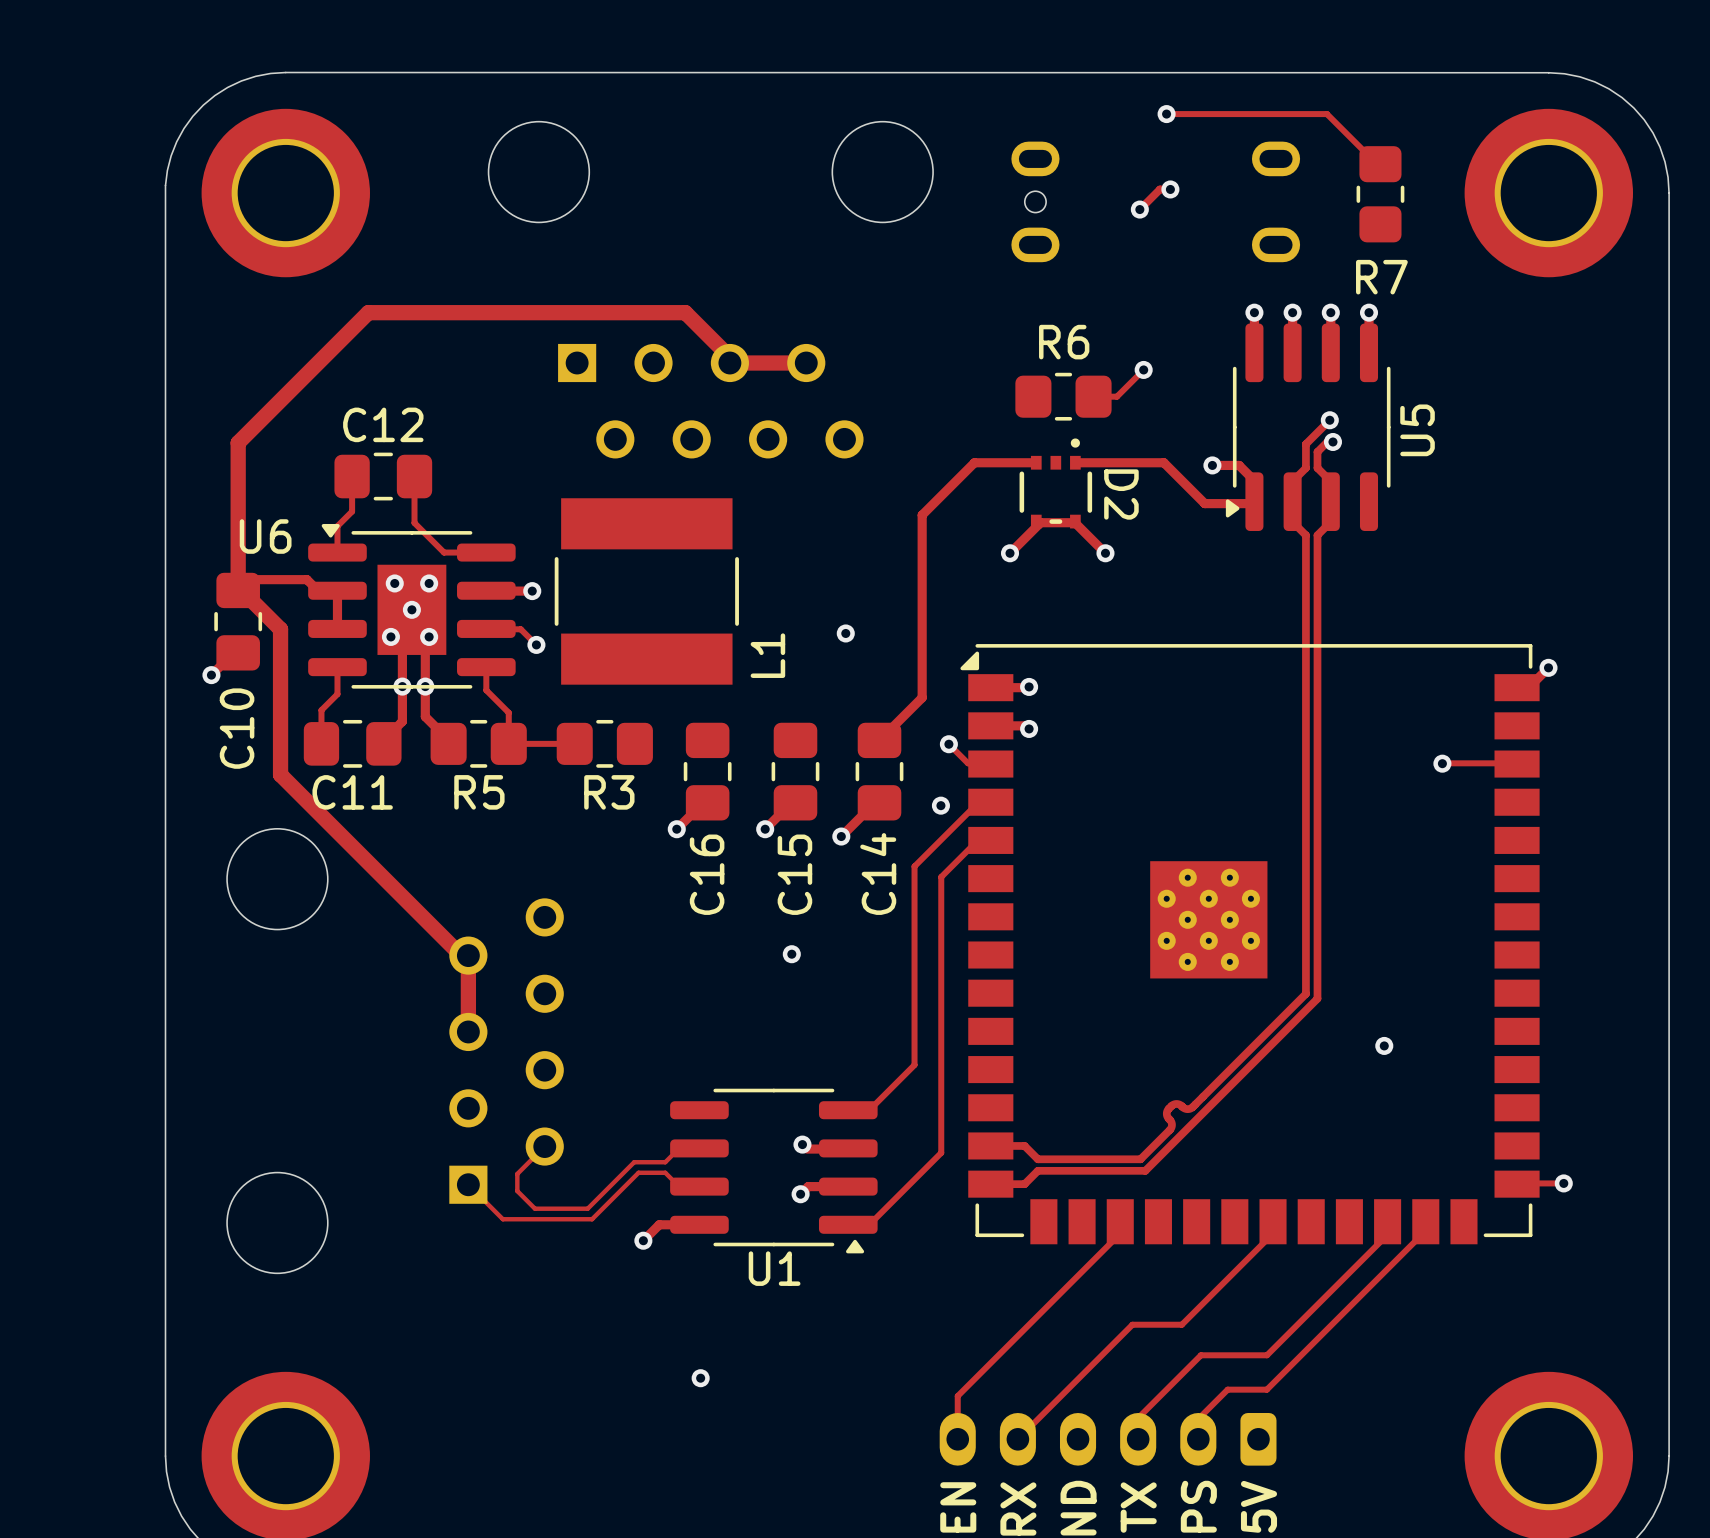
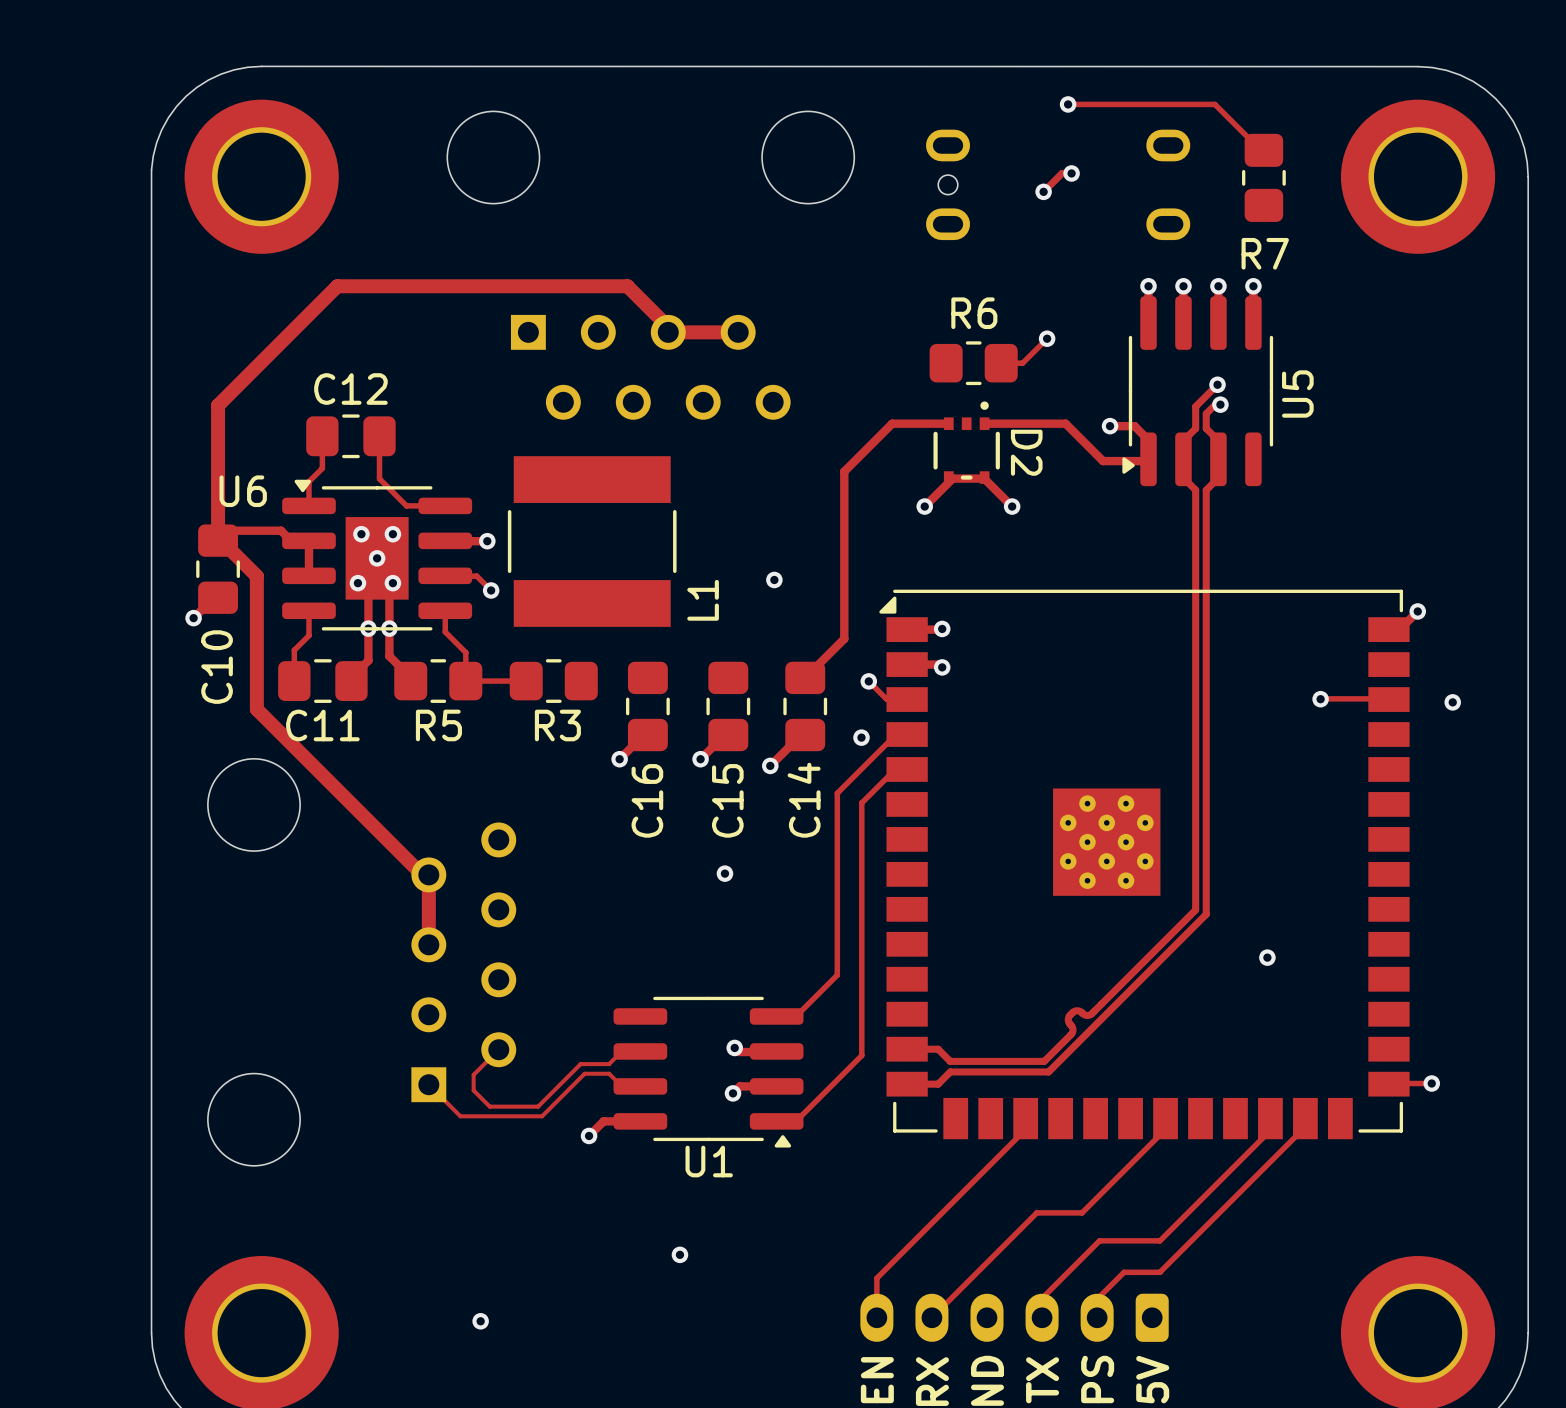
via: none -> (1452, 702)
via position: (700, 1378) -> (679, 1254)
via: none -> (480, 1321)

